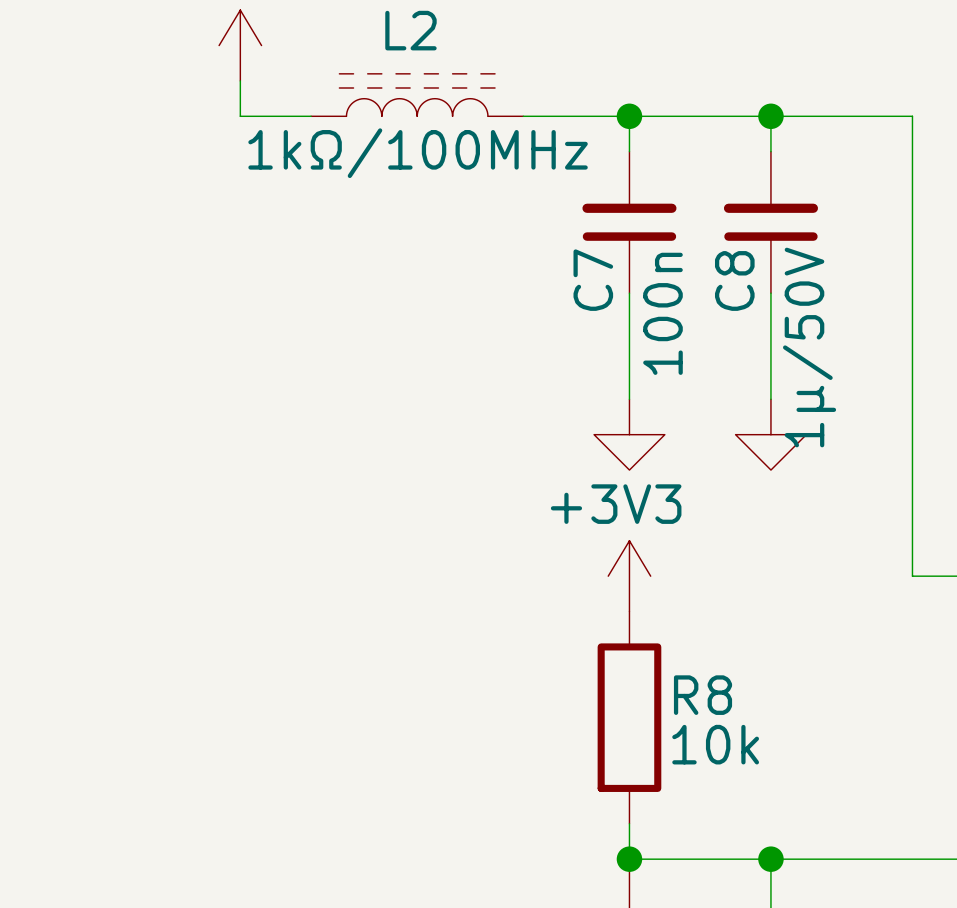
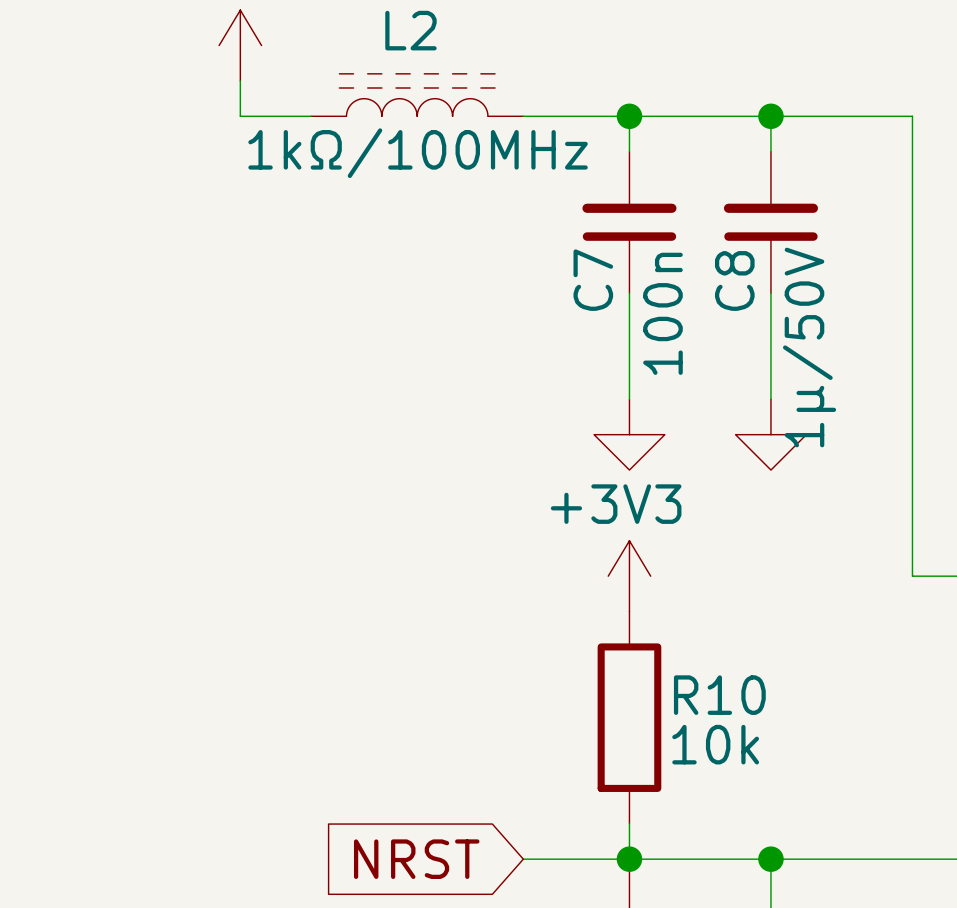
R8 name: R8 (703, 695) -> R10 (719, 695)
global label: none -> NRST (416, 859)
wire: none -> (523, 859) (629, 859)

